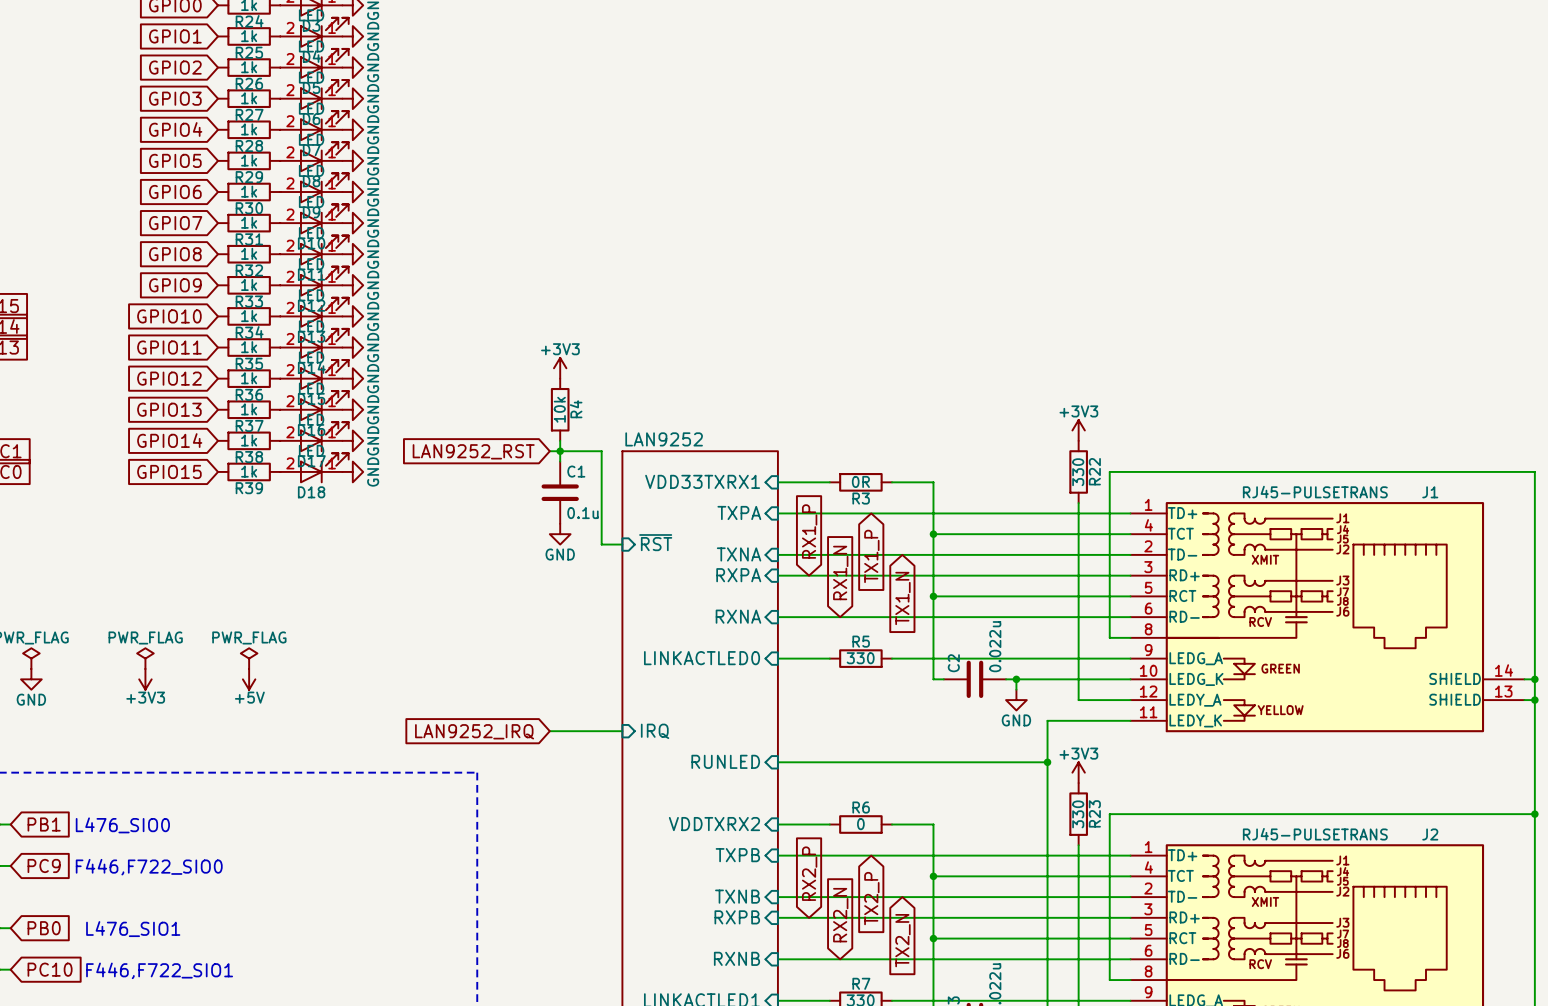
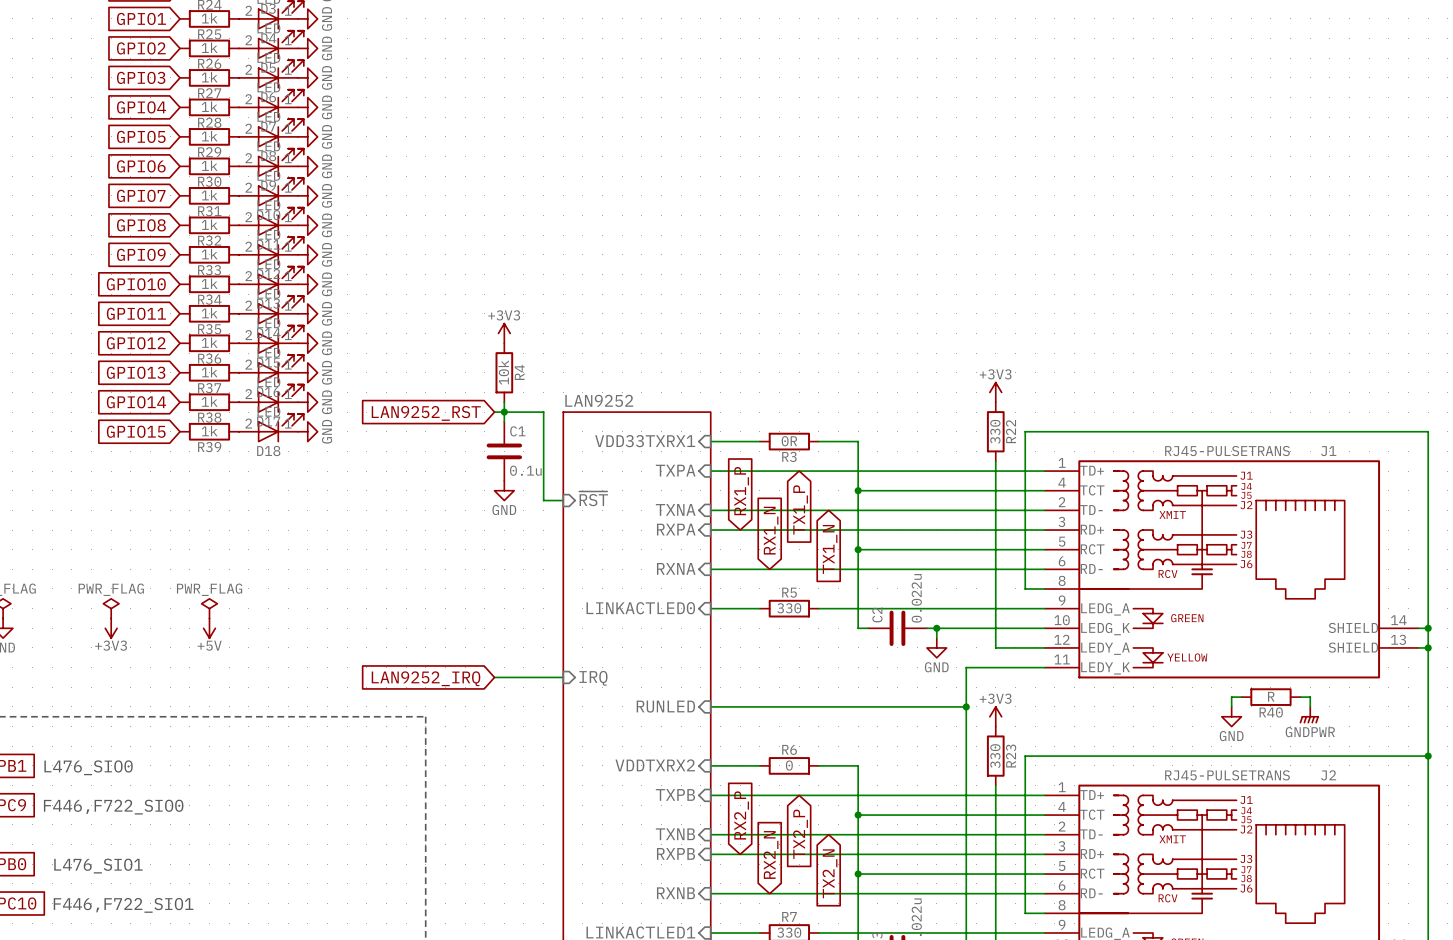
wire: none -> (1241, 697) (1231, 697) (1231, 706)
R40: none -> R (1270, 697)
wire: none -> (1300, 697) (1310, 697) (1310, 706)
power symbol: none -> GNDPWR (1309, 715)
power symbol: none -> GND (1231, 716)

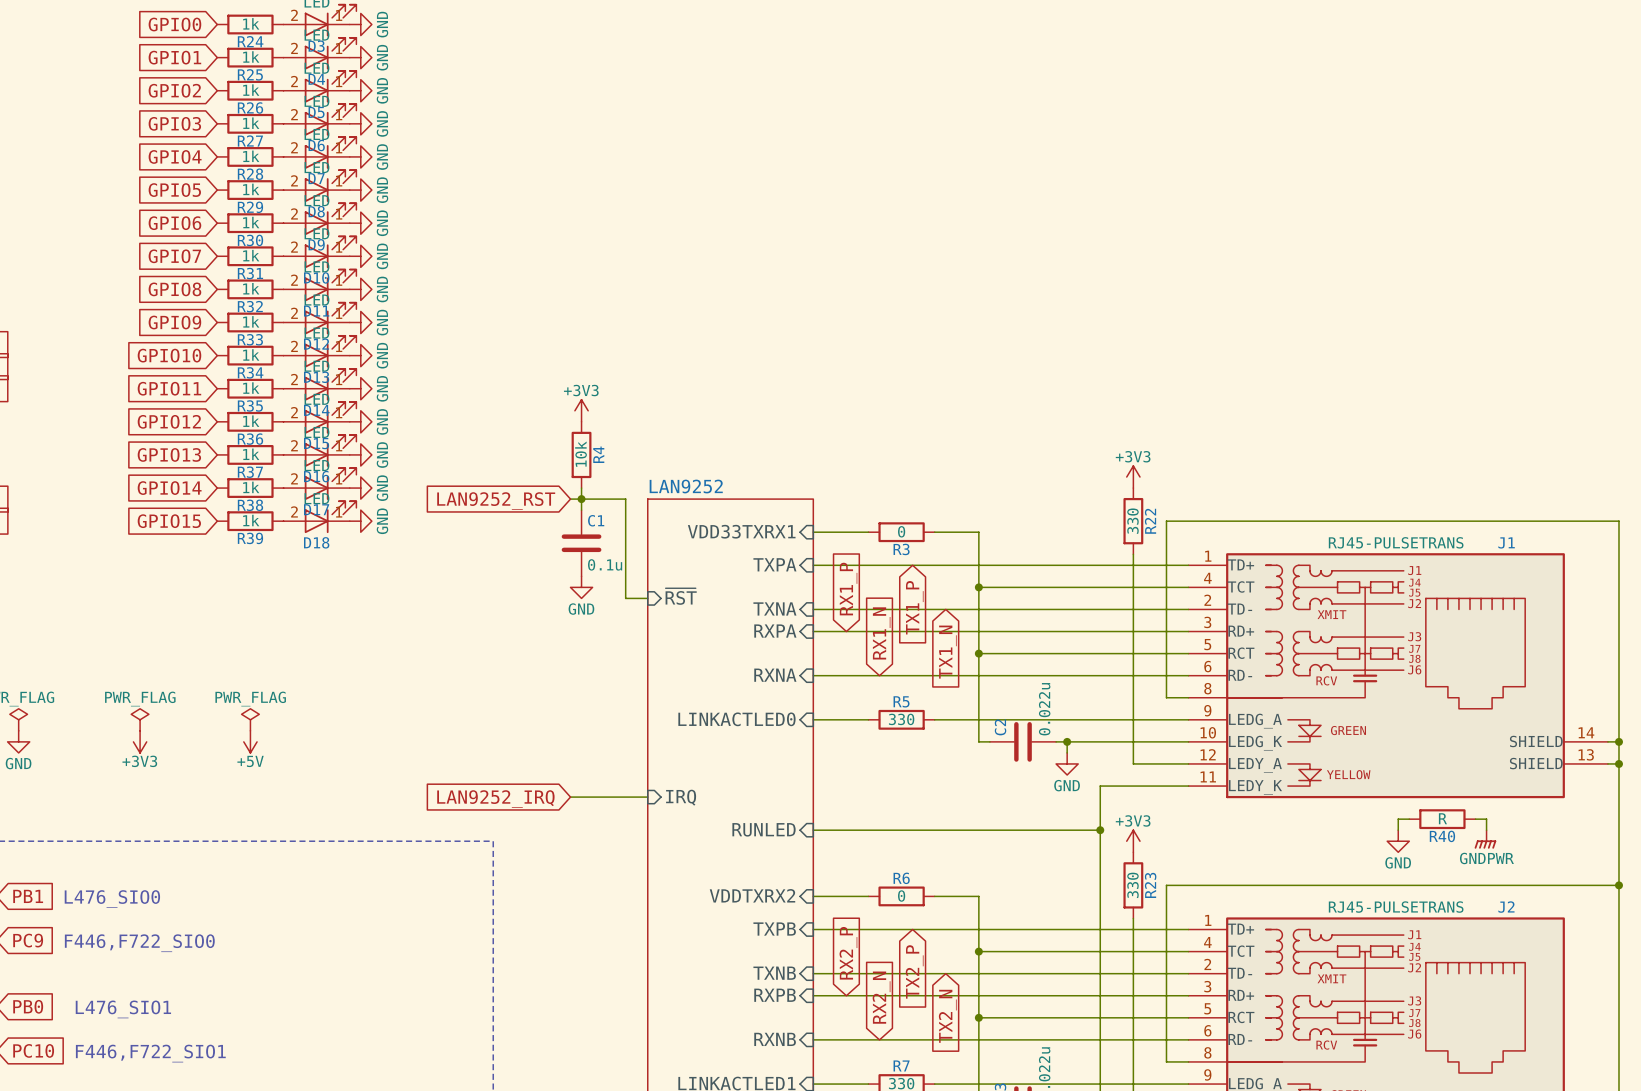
R3 value: 0R (789, 441) -> 0 (901, 531)

